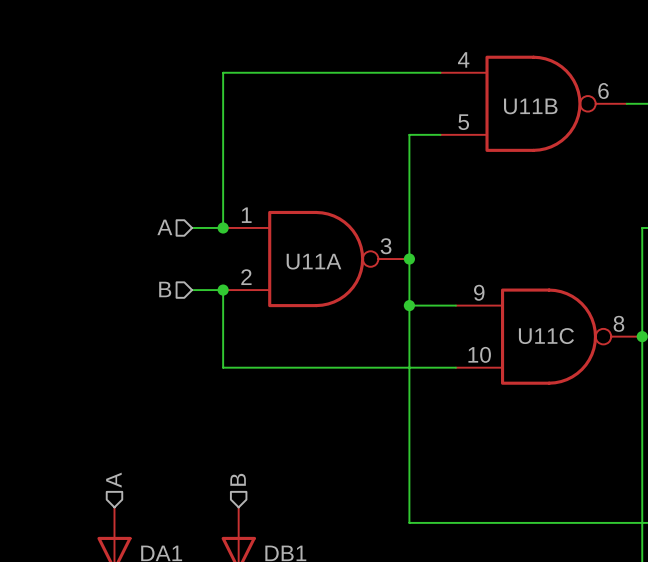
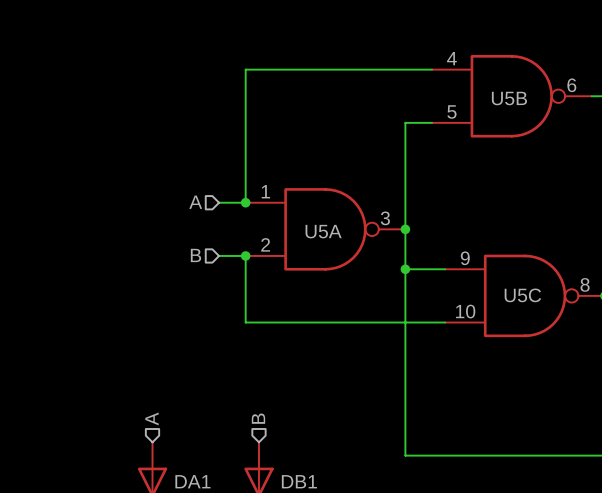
U11B name: U11B (530, 106) -> U5B (509, 98)
U11A name: U11A (314, 261) -> U5A (323, 231)
U11C name: U11C (546, 336) -> U5C (522, 295)

